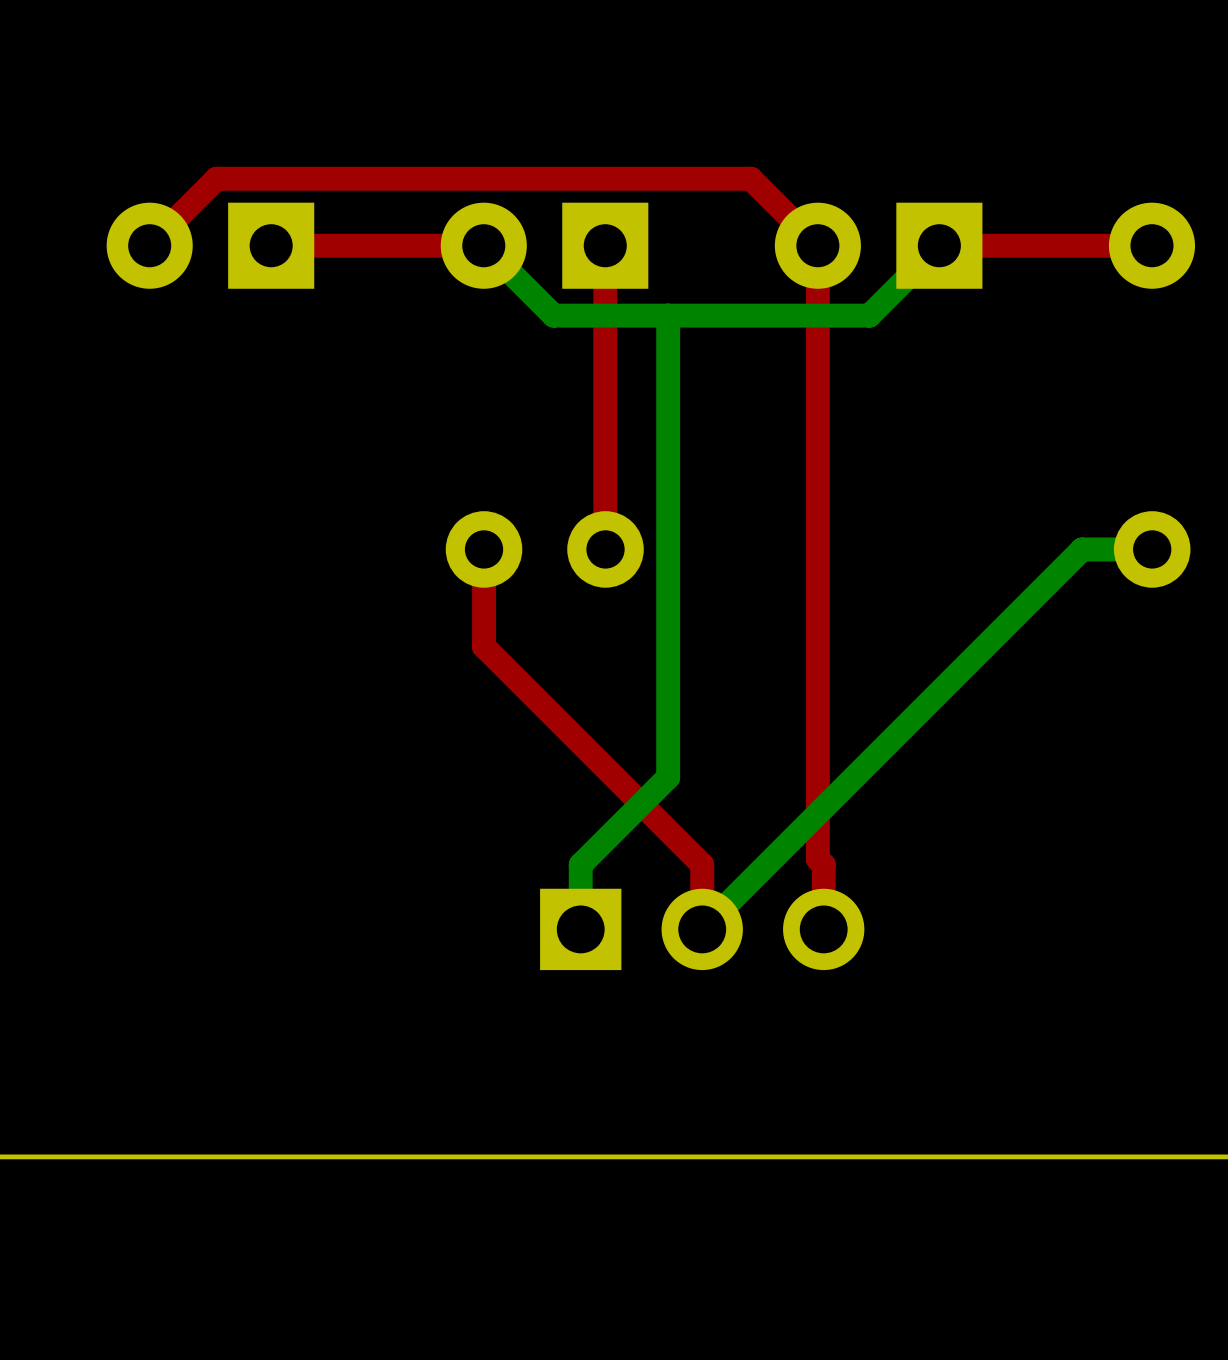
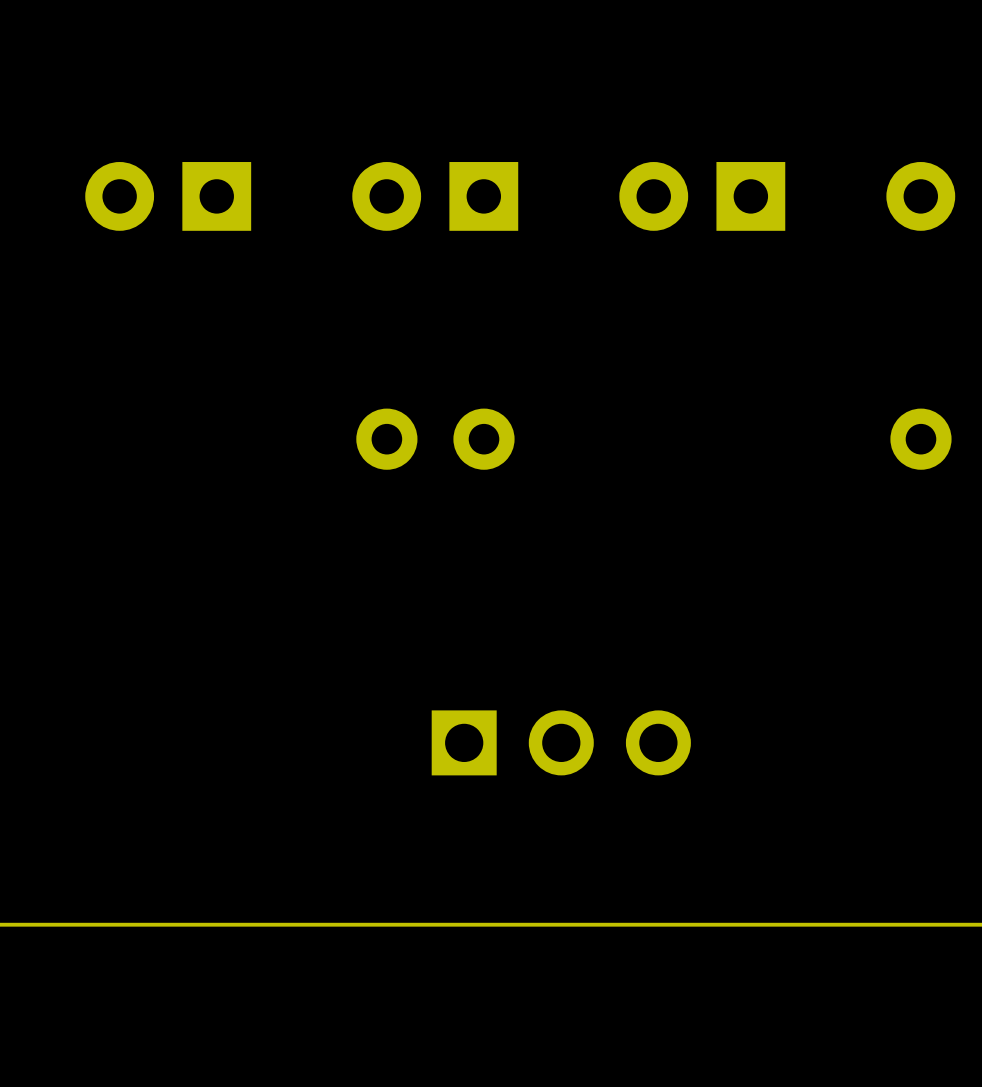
top track: (149, 245) (216, 178) (750, 178) (817, 245) (817, 859) (823, 864) (823, 929) -> none
top track: (483, 245) (271, 245) -> none
top track: (605, 245) (605, 549) -> none
bottom track: (939, 245) (869, 315) (553, 315) (483, 245) -> none
top track: (1151, 245) (939, 245) -> none
bottom track: (668, 315) (668, 777) (580, 864) (580, 929) -> none
top track: (484, 549) (484, 646) (702, 864) (702, 929) -> none
bottom track: (1152, 549) (1082, 549) (702, 929) -> none

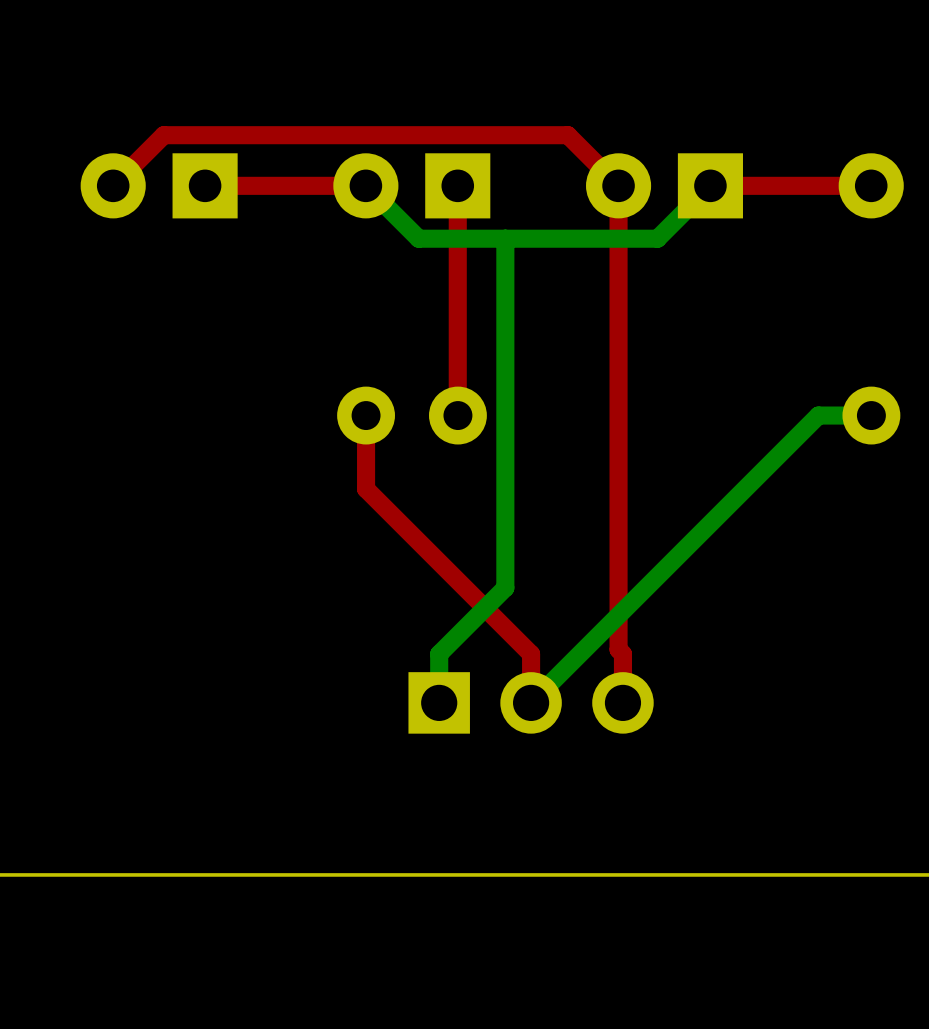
top track: none -> (113, 185) (163, 135) (567, 135) (618, 185) (618, 649) (622, 654) (622, 702)
top track: none -> (365, 185) (205, 185)
top track: none -> (457, 185) (457, 415)
bottom track: none -> (710, 185) (657, 238) (418, 238) (365, 185)
top track: none -> (871, 185) (710, 185)
bottom track: none -> (505, 238) (505, 587) (439, 654) (439, 702)
top track: none -> (366, 415) (366, 489) (531, 654) (531, 702)
bottom track: none -> (871, 415) (818, 415) (531, 702)

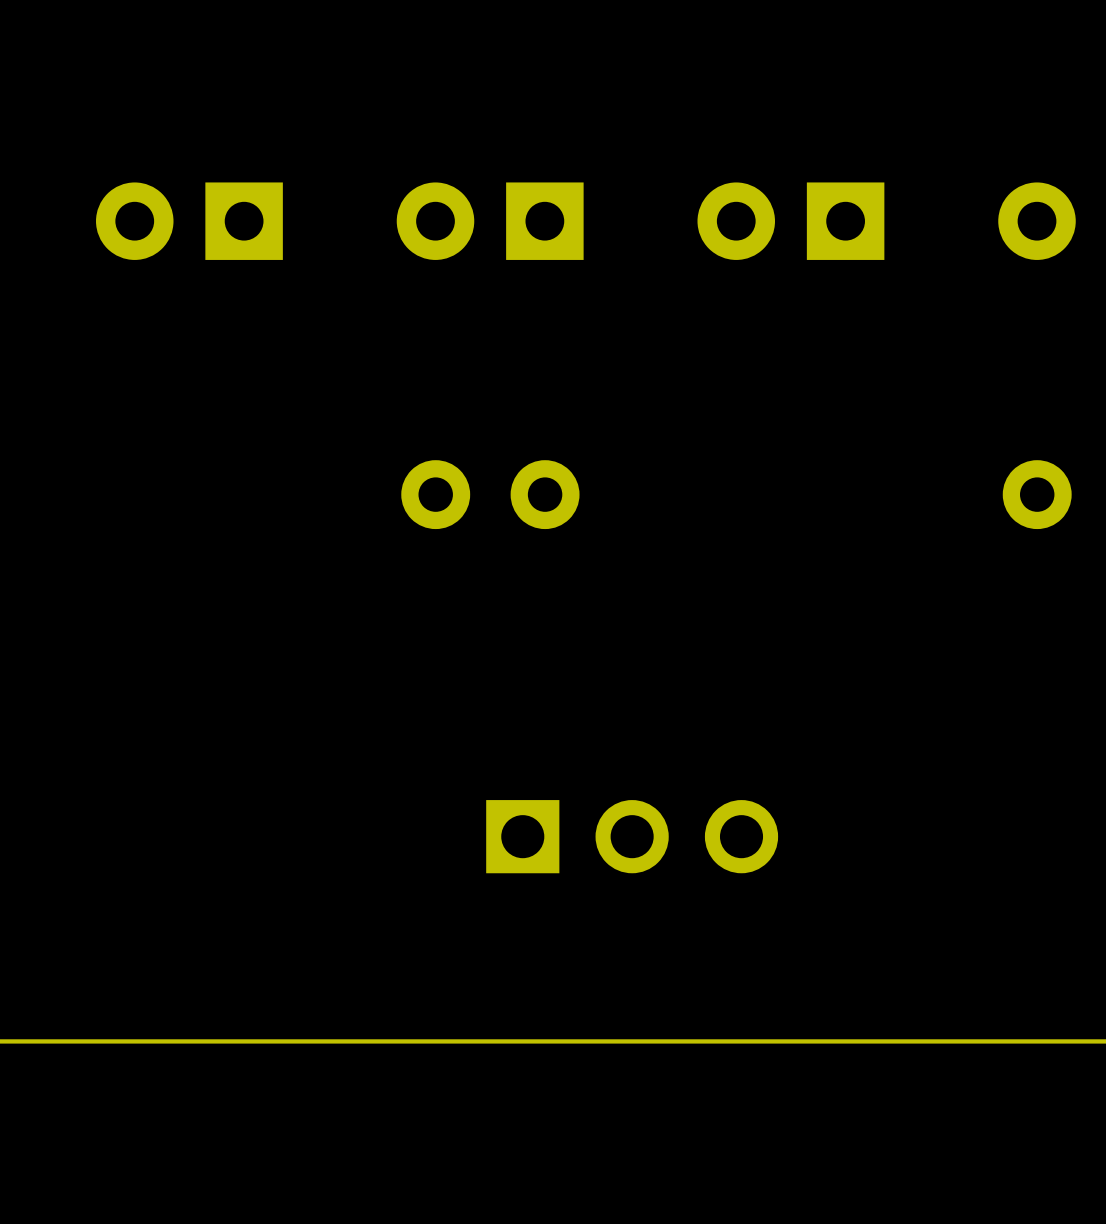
top track: (113, 185) (163, 135) (567, 135) (618, 185) (618, 649) (622, 654) (622, 702) -> none
top track: (365, 185) (205, 185) -> none
top track: (457, 185) (457, 415) -> none
bottom track: (710, 185) (657, 238) (418, 238) (365, 185) -> none
top track: (871, 185) (710, 185) -> none
bottom track: (505, 238) (505, 587) (439, 654) (439, 702) -> none
top track: (366, 415) (366, 489) (531, 654) (531, 702) -> none
bottom track: (871, 415) (818, 415) (531, 702) -> none

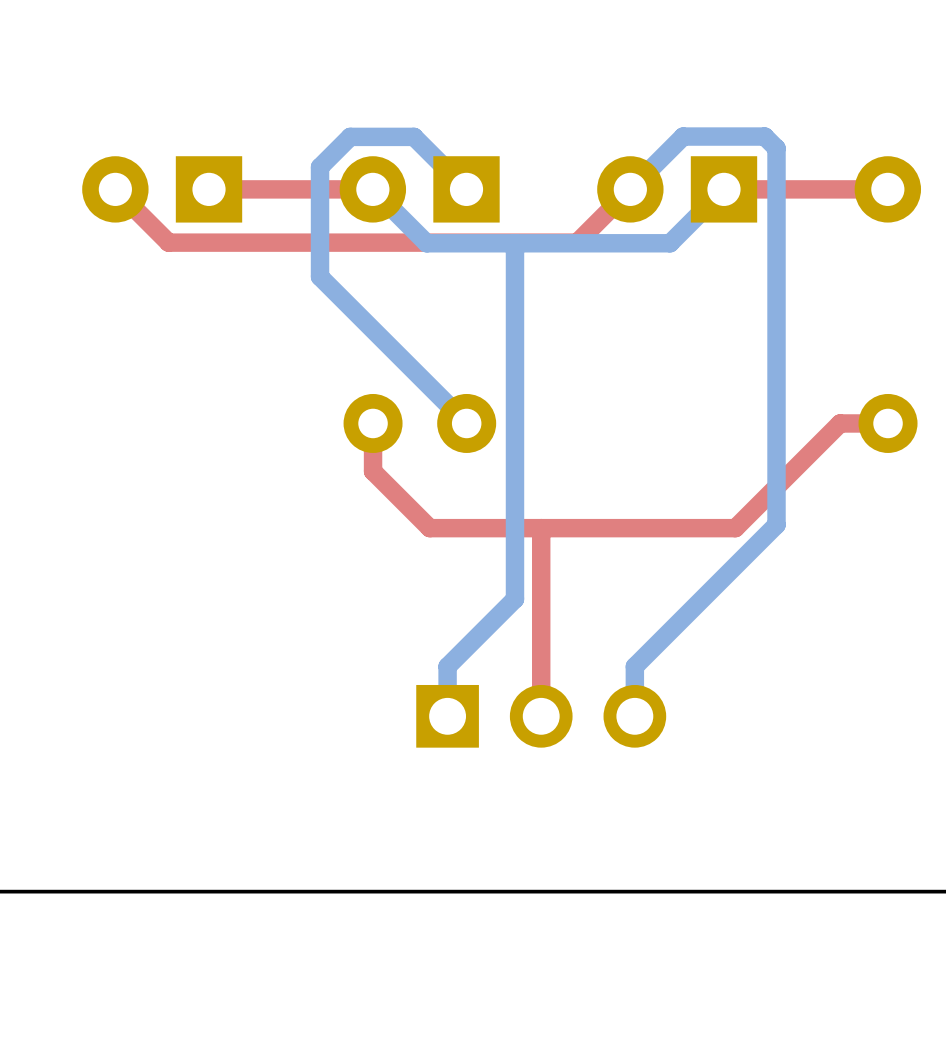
top track: none -> (372, 189) (209, 189)
bottom track: none -> (466, 189) (413, 136) (350, 136) (320, 167) (320, 276) (466, 423)
bottom track: none -> (630, 189) (683, 136) (764, 136) (776, 148) (776, 524) (634, 666) (634, 716)
top track: none -> (630, 189) (577, 242) (168, 242) (115, 189)
bottom track: none -> (723, 189) (670, 243) (426, 243) (372, 189)
top track: none -> (887, 189) (723, 189)
bottom track: none -> (514, 243) (514, 599) (447, 666) (447, 716)
top track: none -> (888, 423) (840, 423) (735, 528) (429, 528) (373, 471) (373, 423)
top track: none -> (541, 528) (541, 716)

